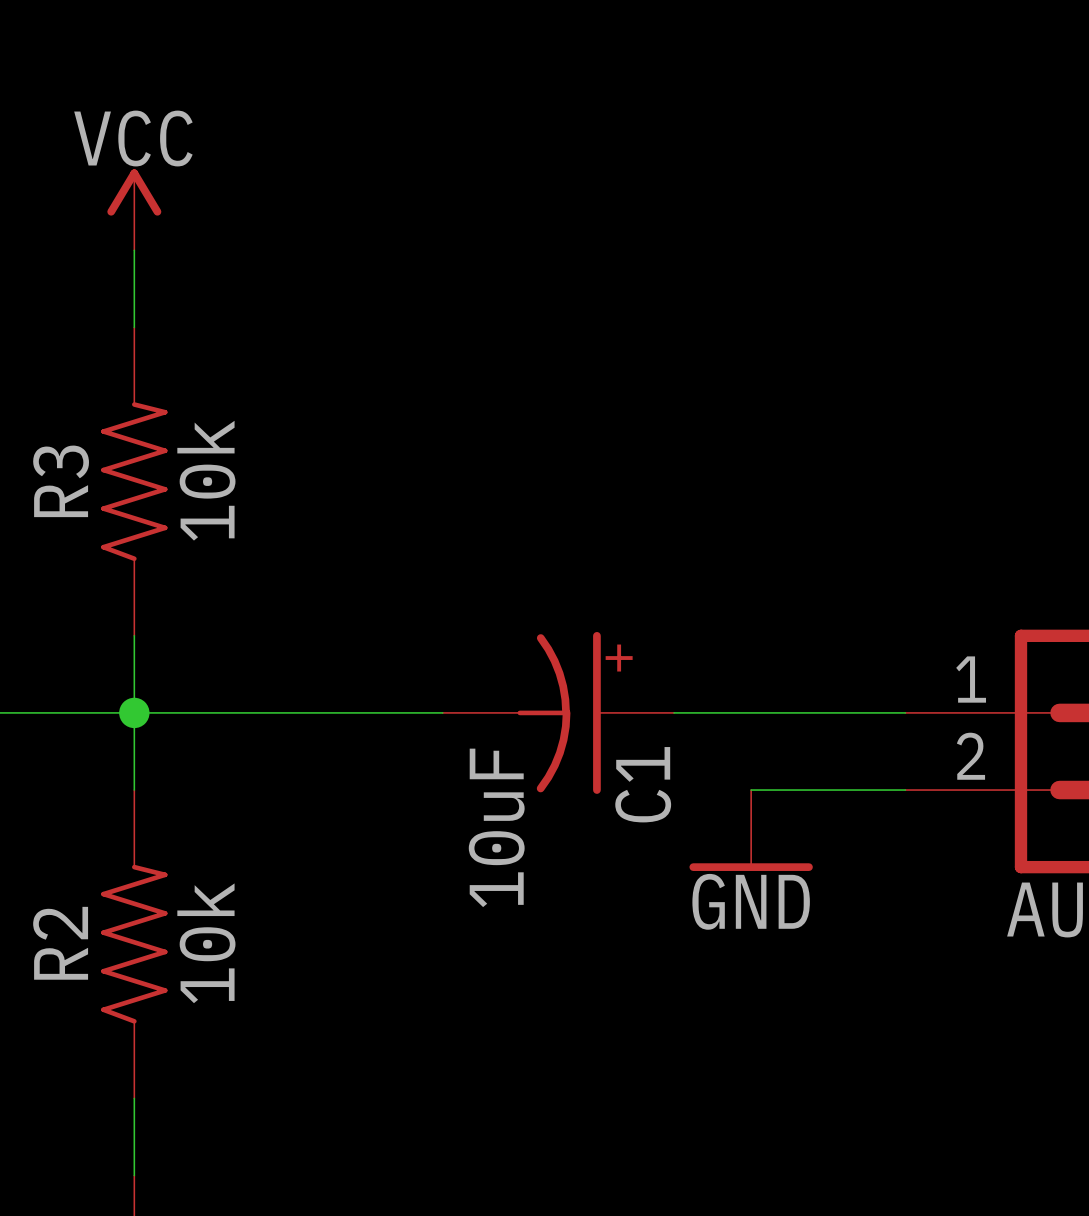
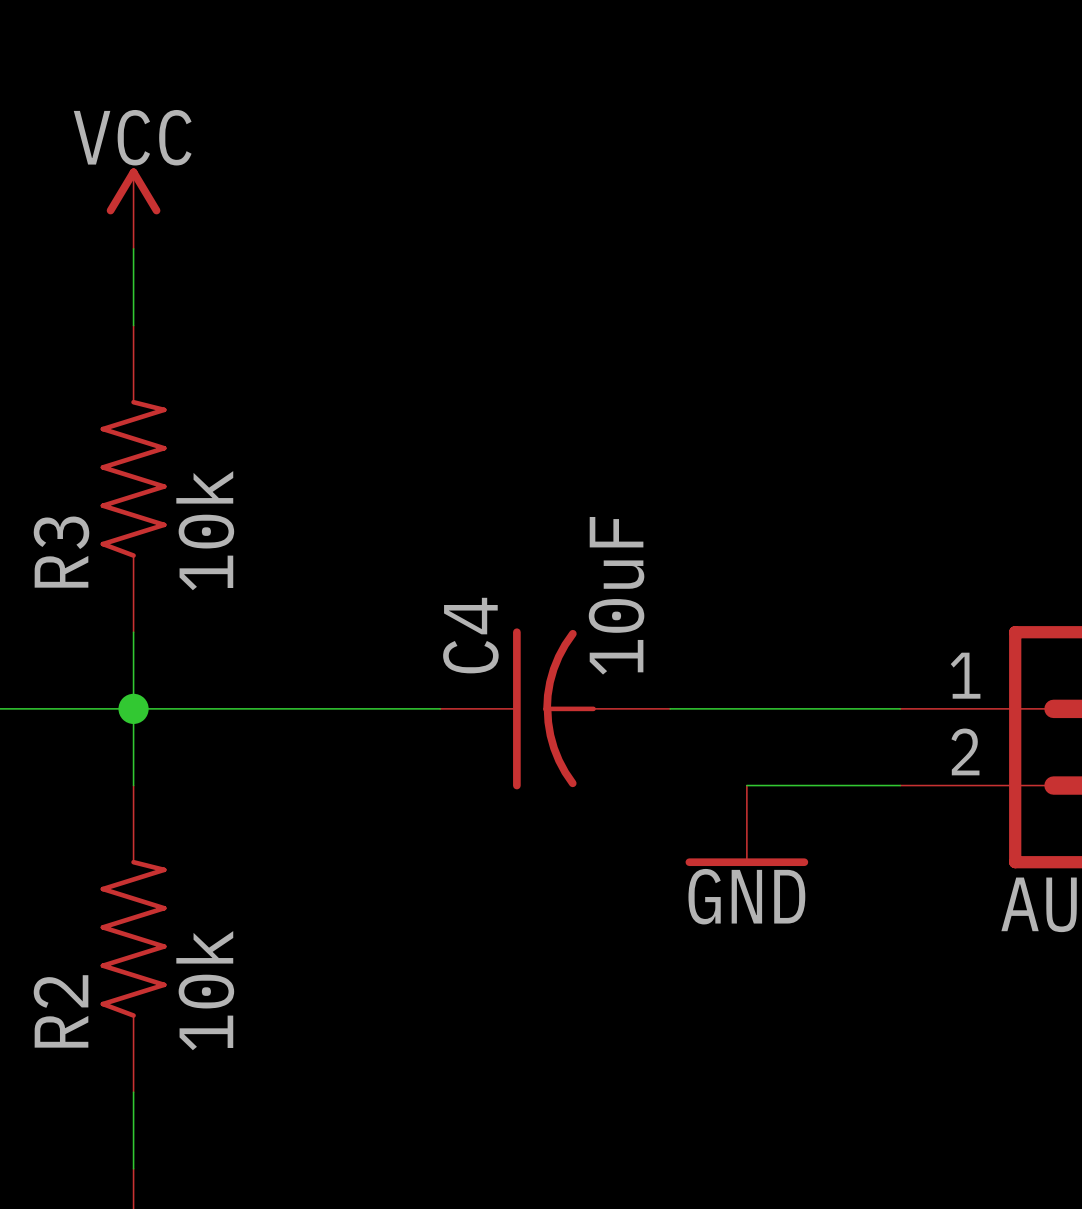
R3 value position: 10k (206, 480) -> 10k (205, 530)
R3 name position: R3 (61, 481) -> R3 (61, 552)
C1: 10uF (558, 712) -> none
C4: none -> 10uF (555, 708)
R2 name position: R2 (60, 943) -> R2 (61, 1011)
R2 value position: 10k (206, 943) -> 10k (205, 990)

